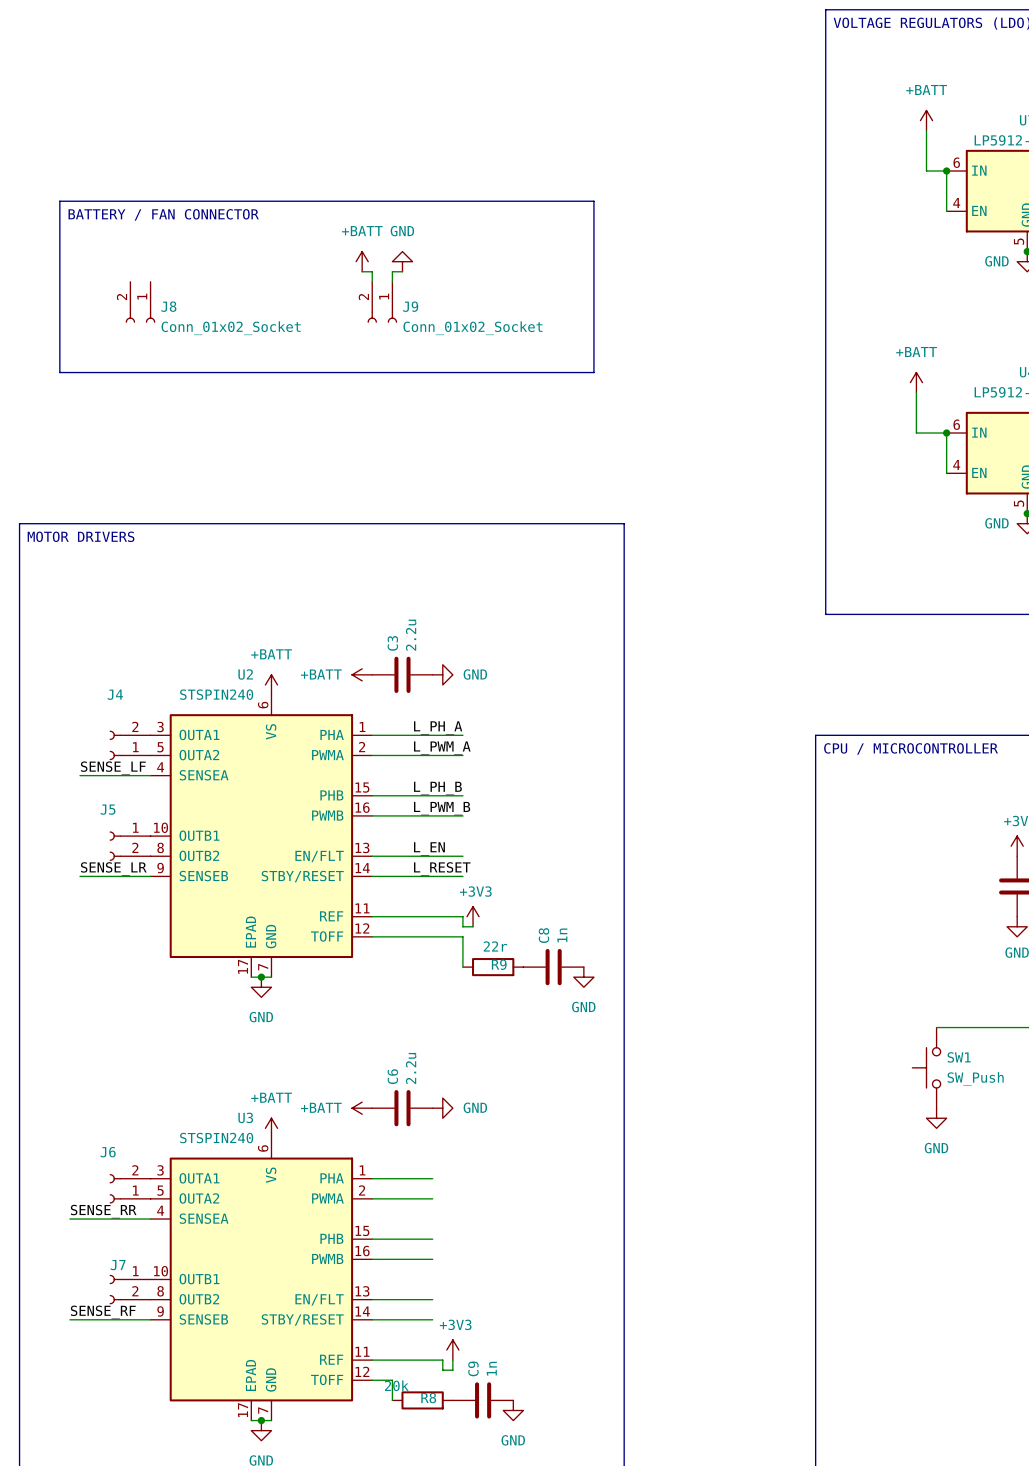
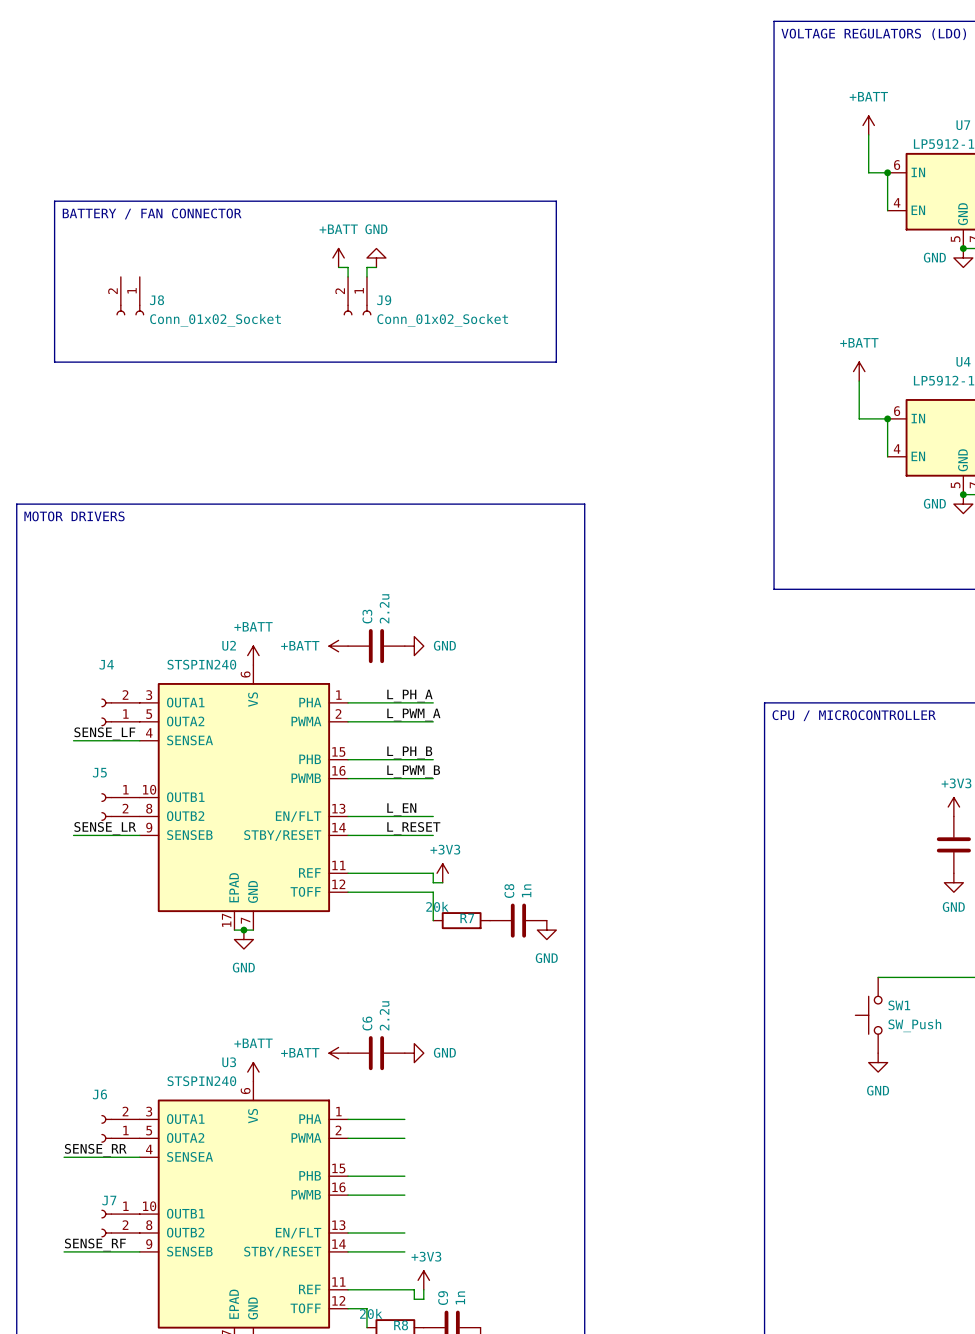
R9 value: 22r (495, 946) -> 20k (437, 906)
R9 name: R9 (499, 964) -> R7 (467, 918)

